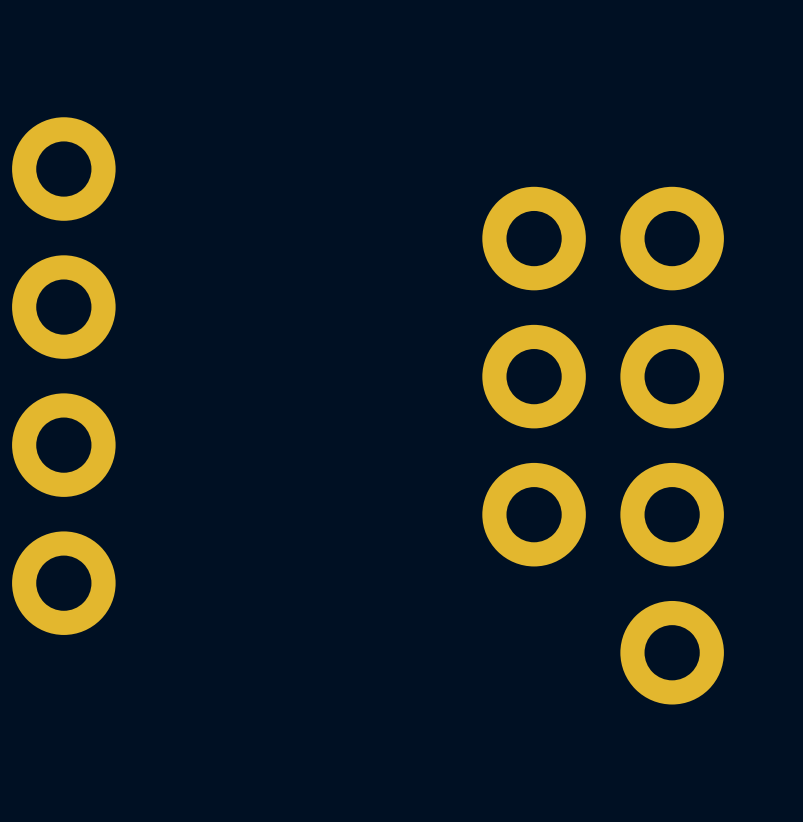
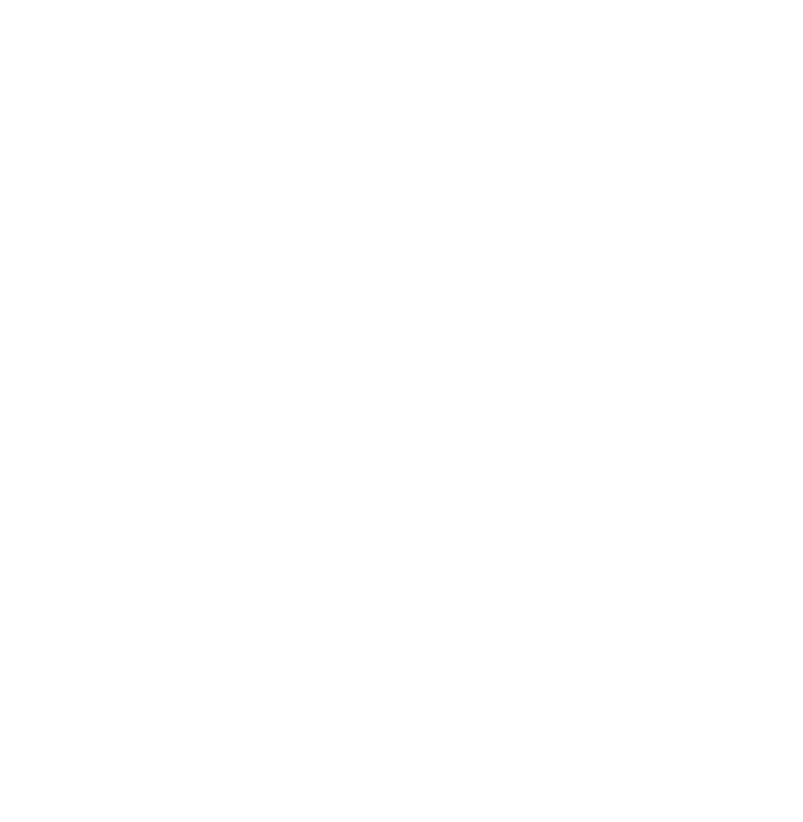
part: (63, 169) -> none
part: (534, 238) -> none
part: (672, 238) -> none
part: (63, 307) -> none
part: (534, 376) -> none
part: (672, 376) -> none
part: (63, 445) -> none
part: (534, 514) -> none
part: (672, 514) -> none
part: (63, 583) -> none
part: (672, 652) -> none

